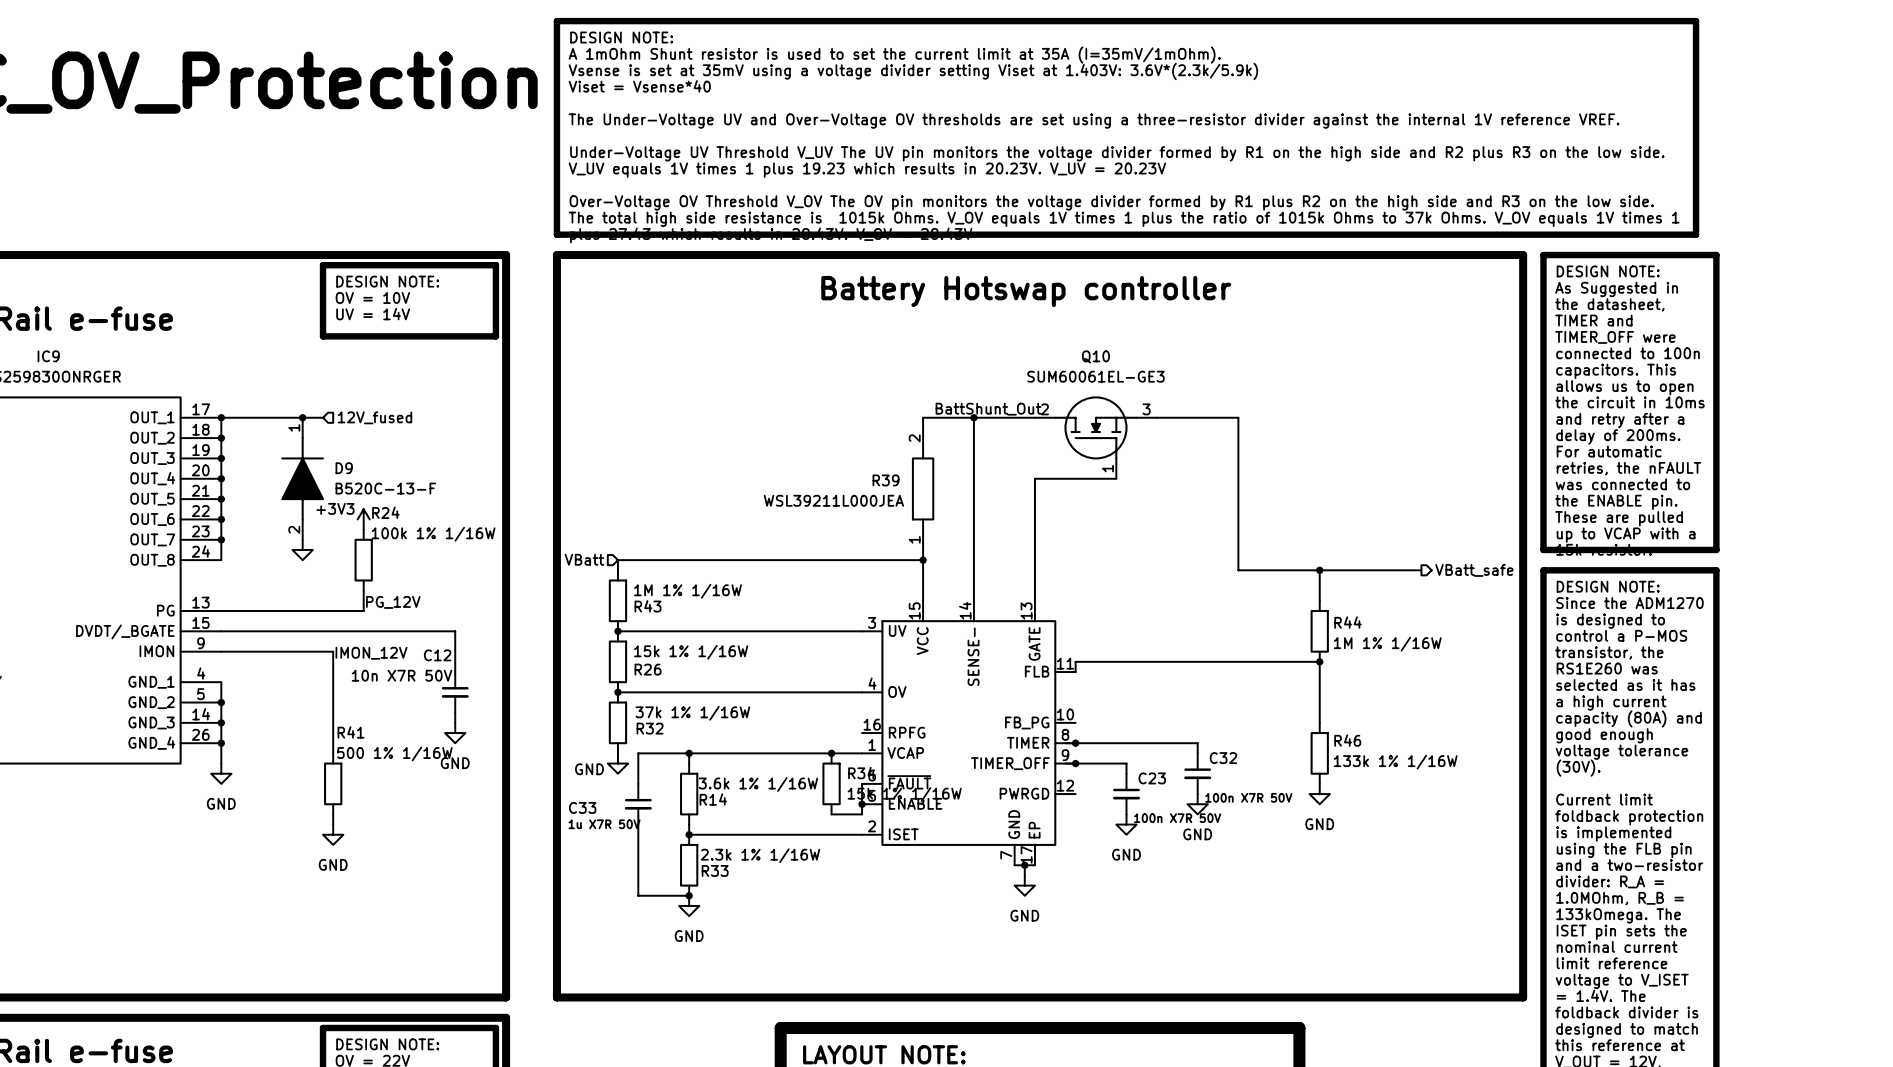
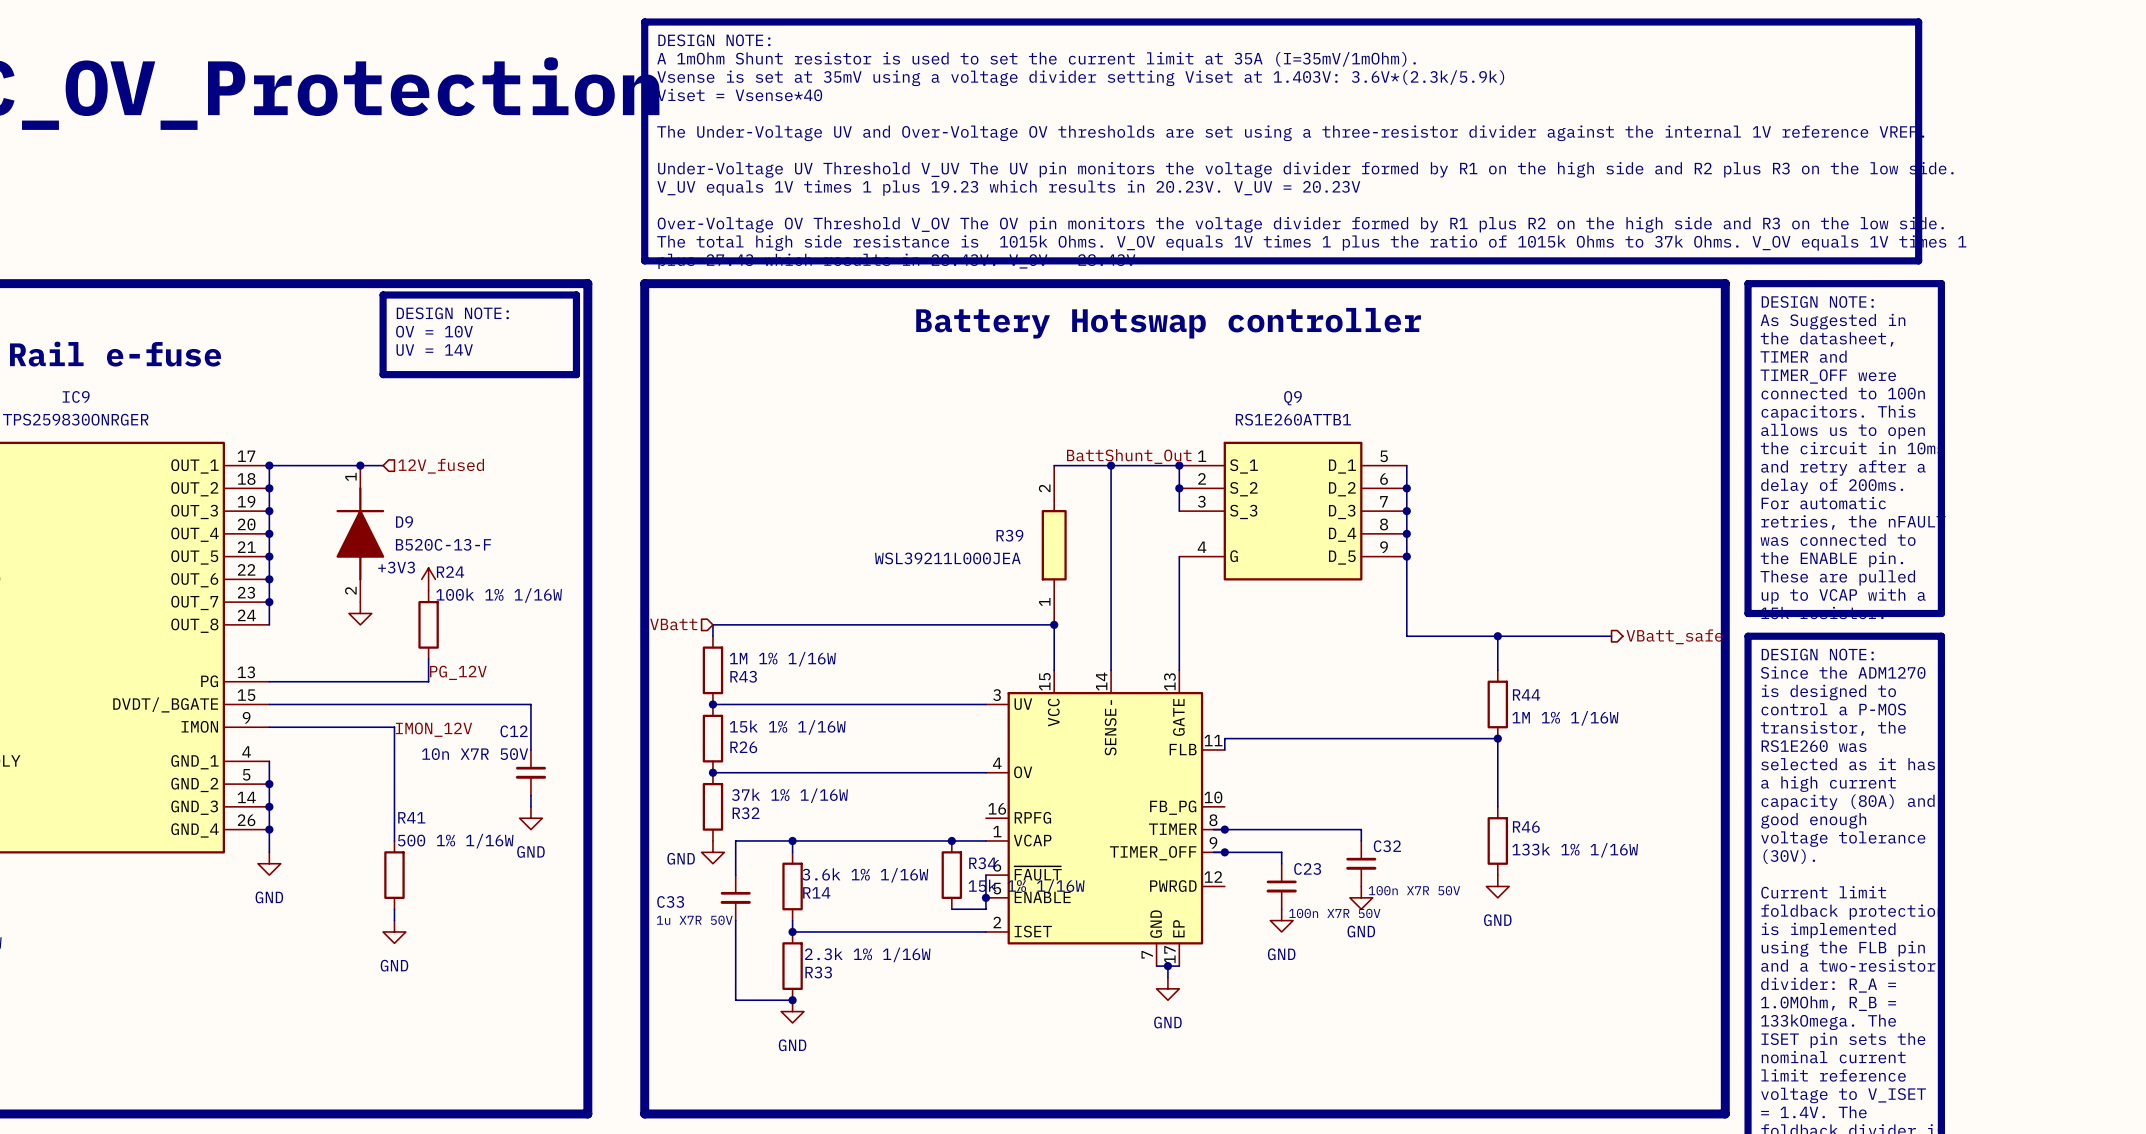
wire: none -> (1179, 465) (1179, 511)
junction: none -> (1179, 465)
Q10: SUM60061EL-GE3 (1095, 437) -> none
junction: none -> (1179, 488)
junction: none -> (1406, 488)
Q9: none -> RS1E260ATTB1 (1293, 511)
junction: none -> (1406, 511)
wire: (1116, 478) (1034, 478) (1034, 499) -> none
junction: none -> (1406, 533)
junction: none -> (1406, 556)

